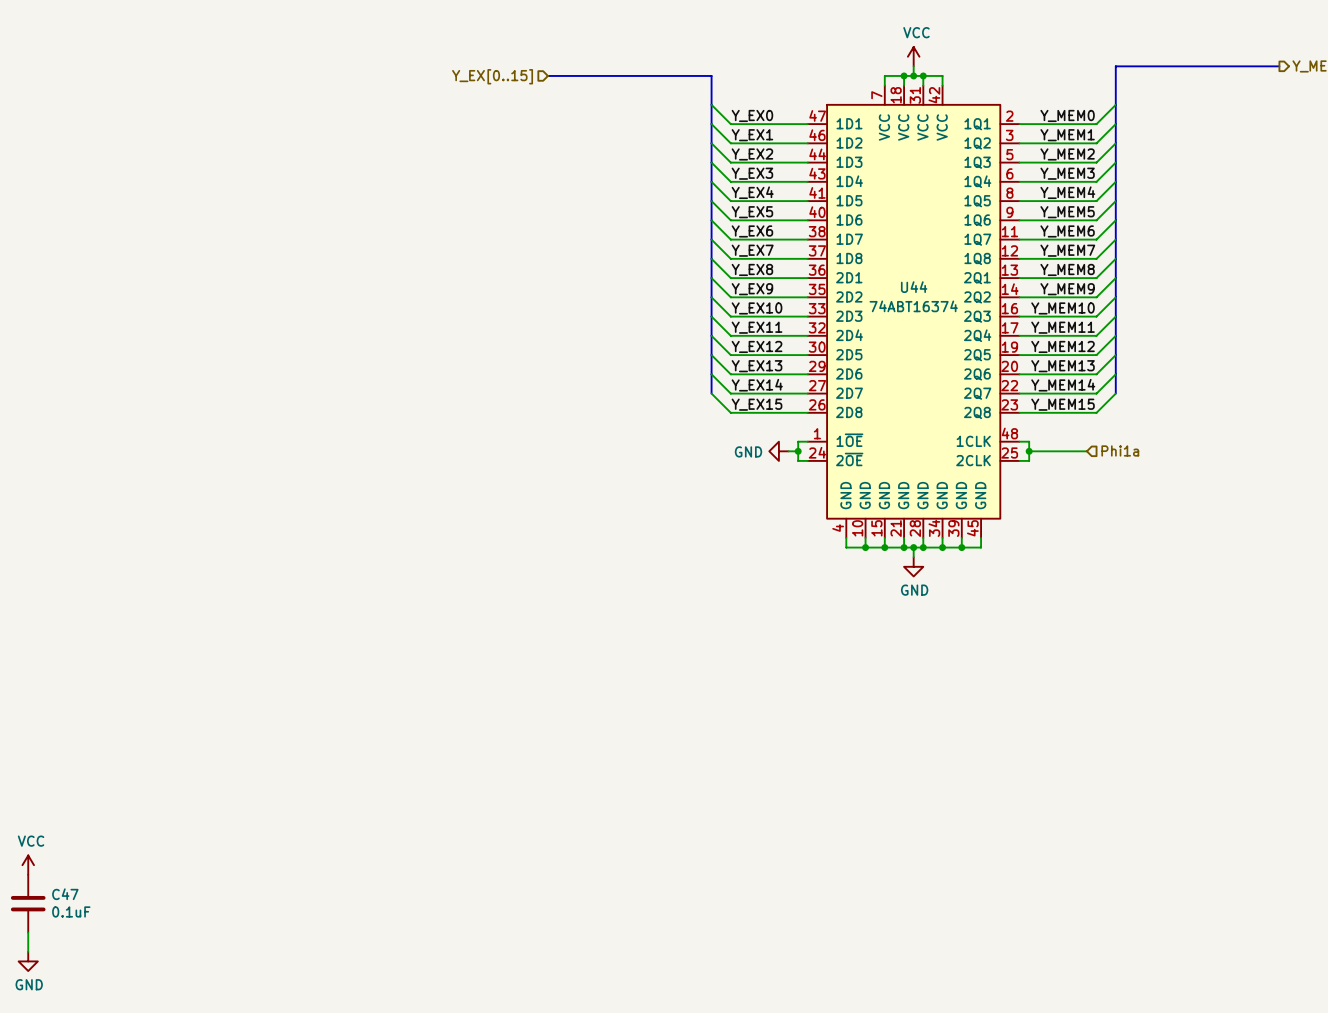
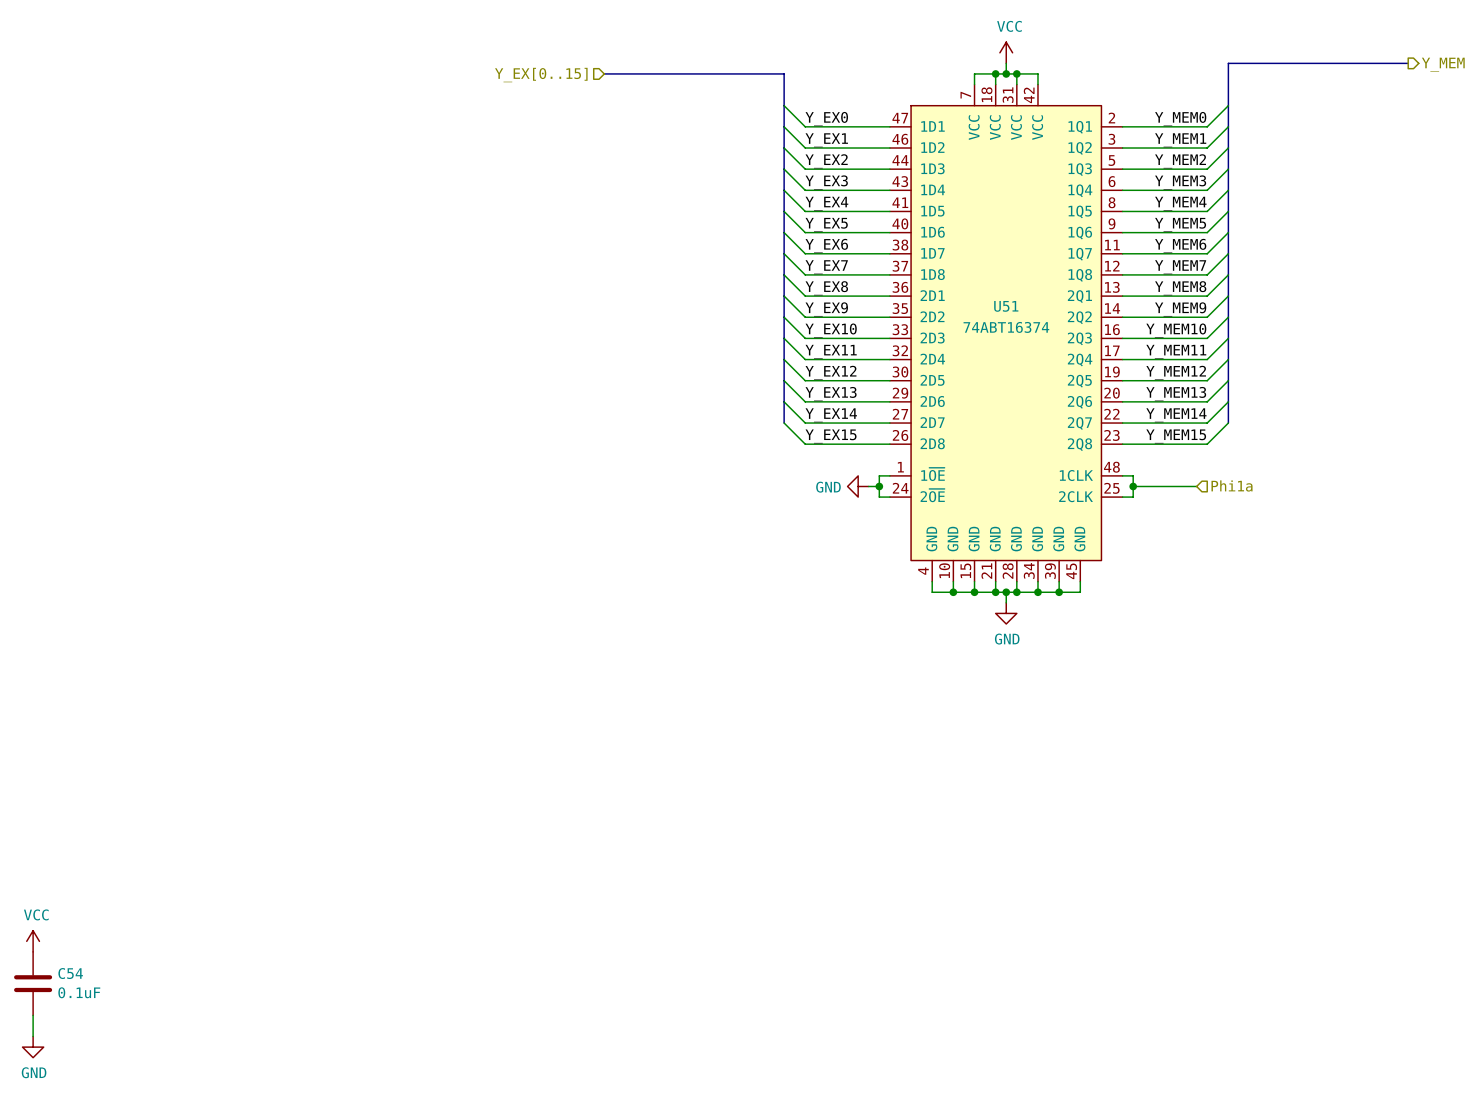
U44 name: U44 (914, 287) -> U51 (1006, 306)
C47 name: C47 (65, 894) -> C54 (70, 973)

